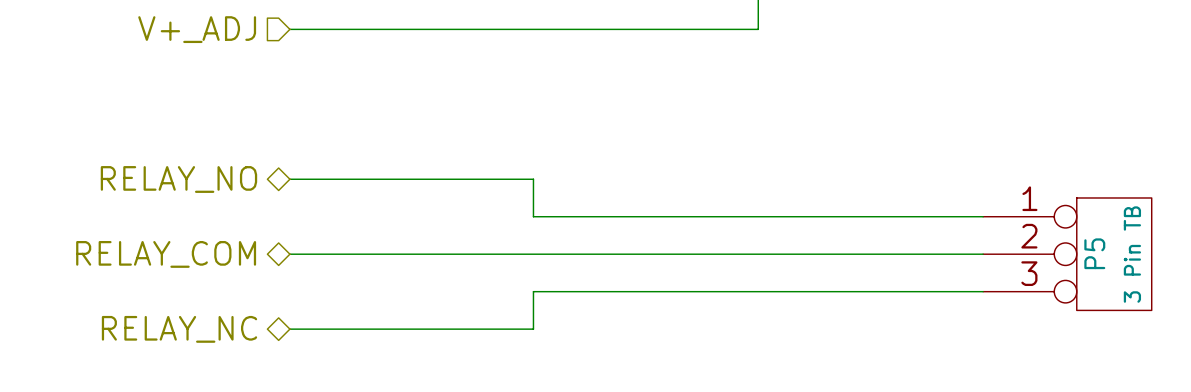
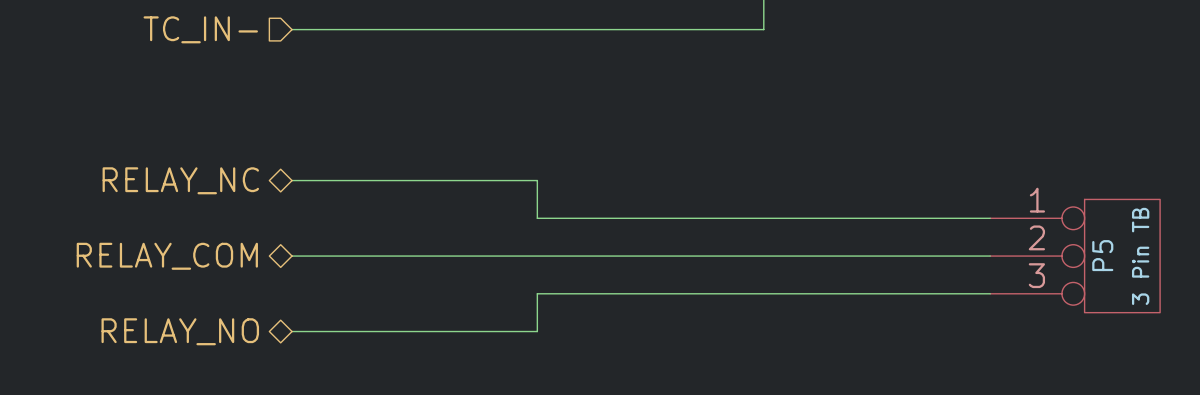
hierarchical label: V+_ADJ (197, 29) -> TC_IN- (200, 29)
hierarchical label: RELAY_NO (178, 179) -> RELAY_NC (180, 180)
hierarchical label: RELAY_NC (179, 329) -> RELAY_NO (180, 331)

